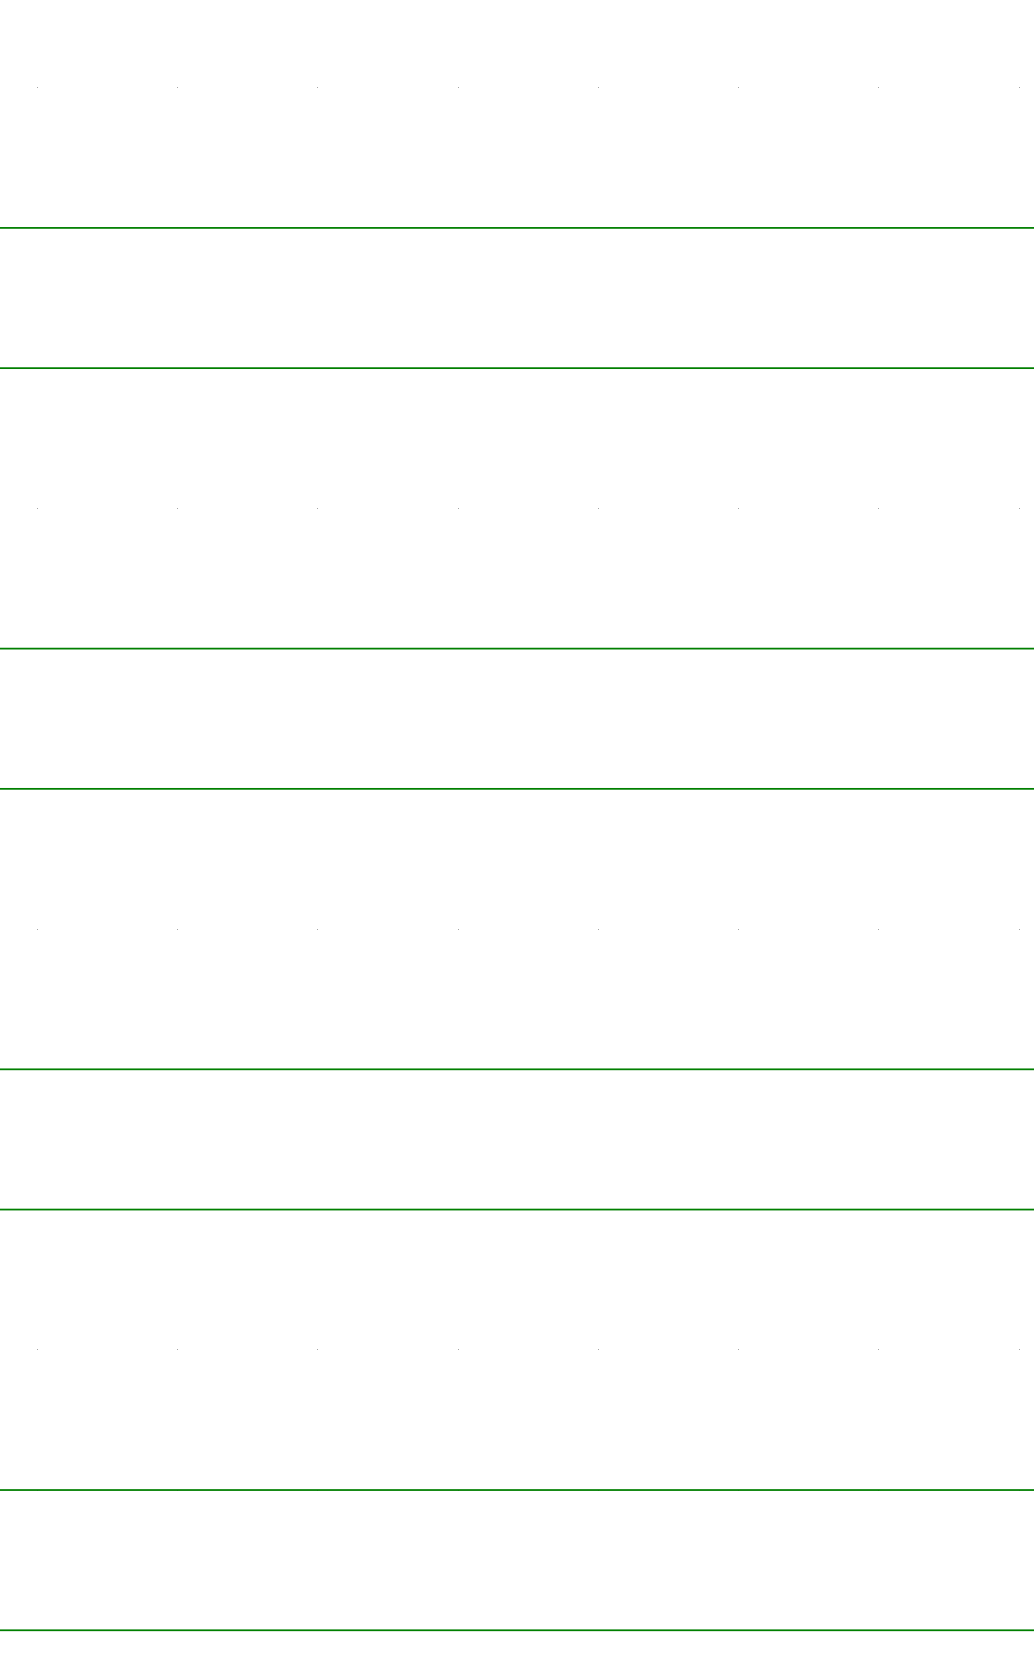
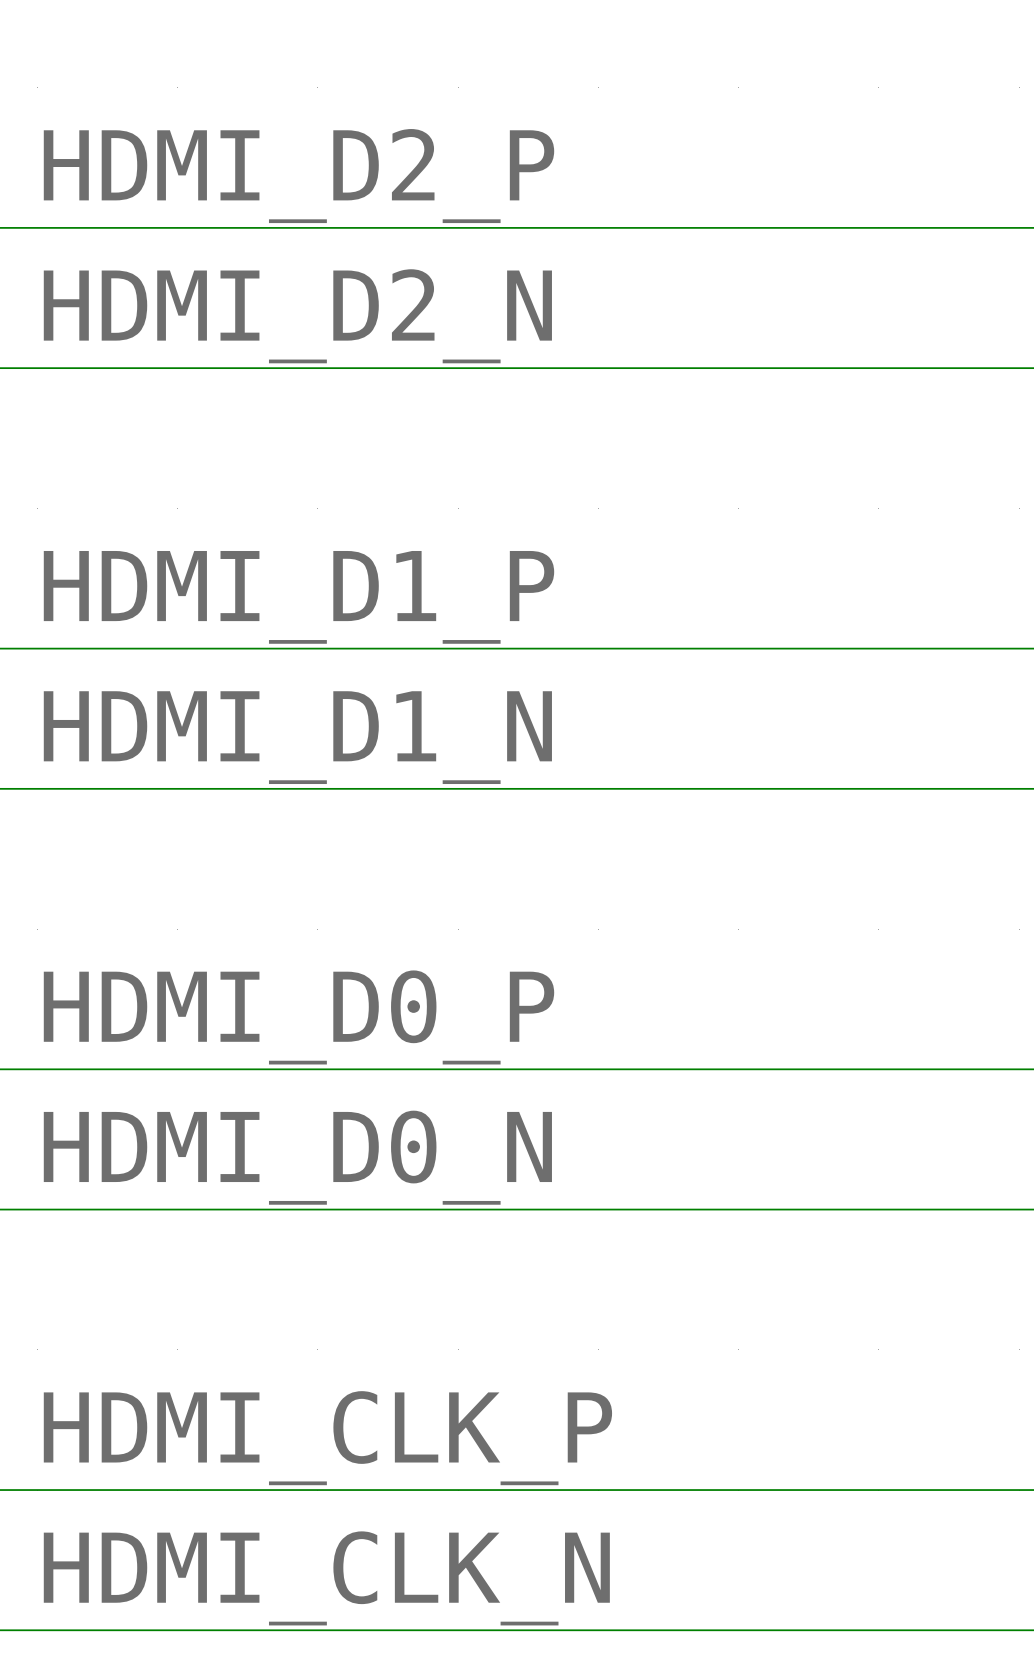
label: none -> HDMI_D2_P (298, 176)
label: none -> HDMI_D2_N (297, 316)
label: none -> HDMI_D1_P (298, 597)
label: none -> HDMI_D1_N (297, 737)
label: none -> HDMI_D0_P (298, 1017)
label: none -> HDMI_D0_N (297, 1157)
label: none -> HDMI_CLK_P (327, 1438)
label: none -> HDMI_CLK_N (326, 1578)

